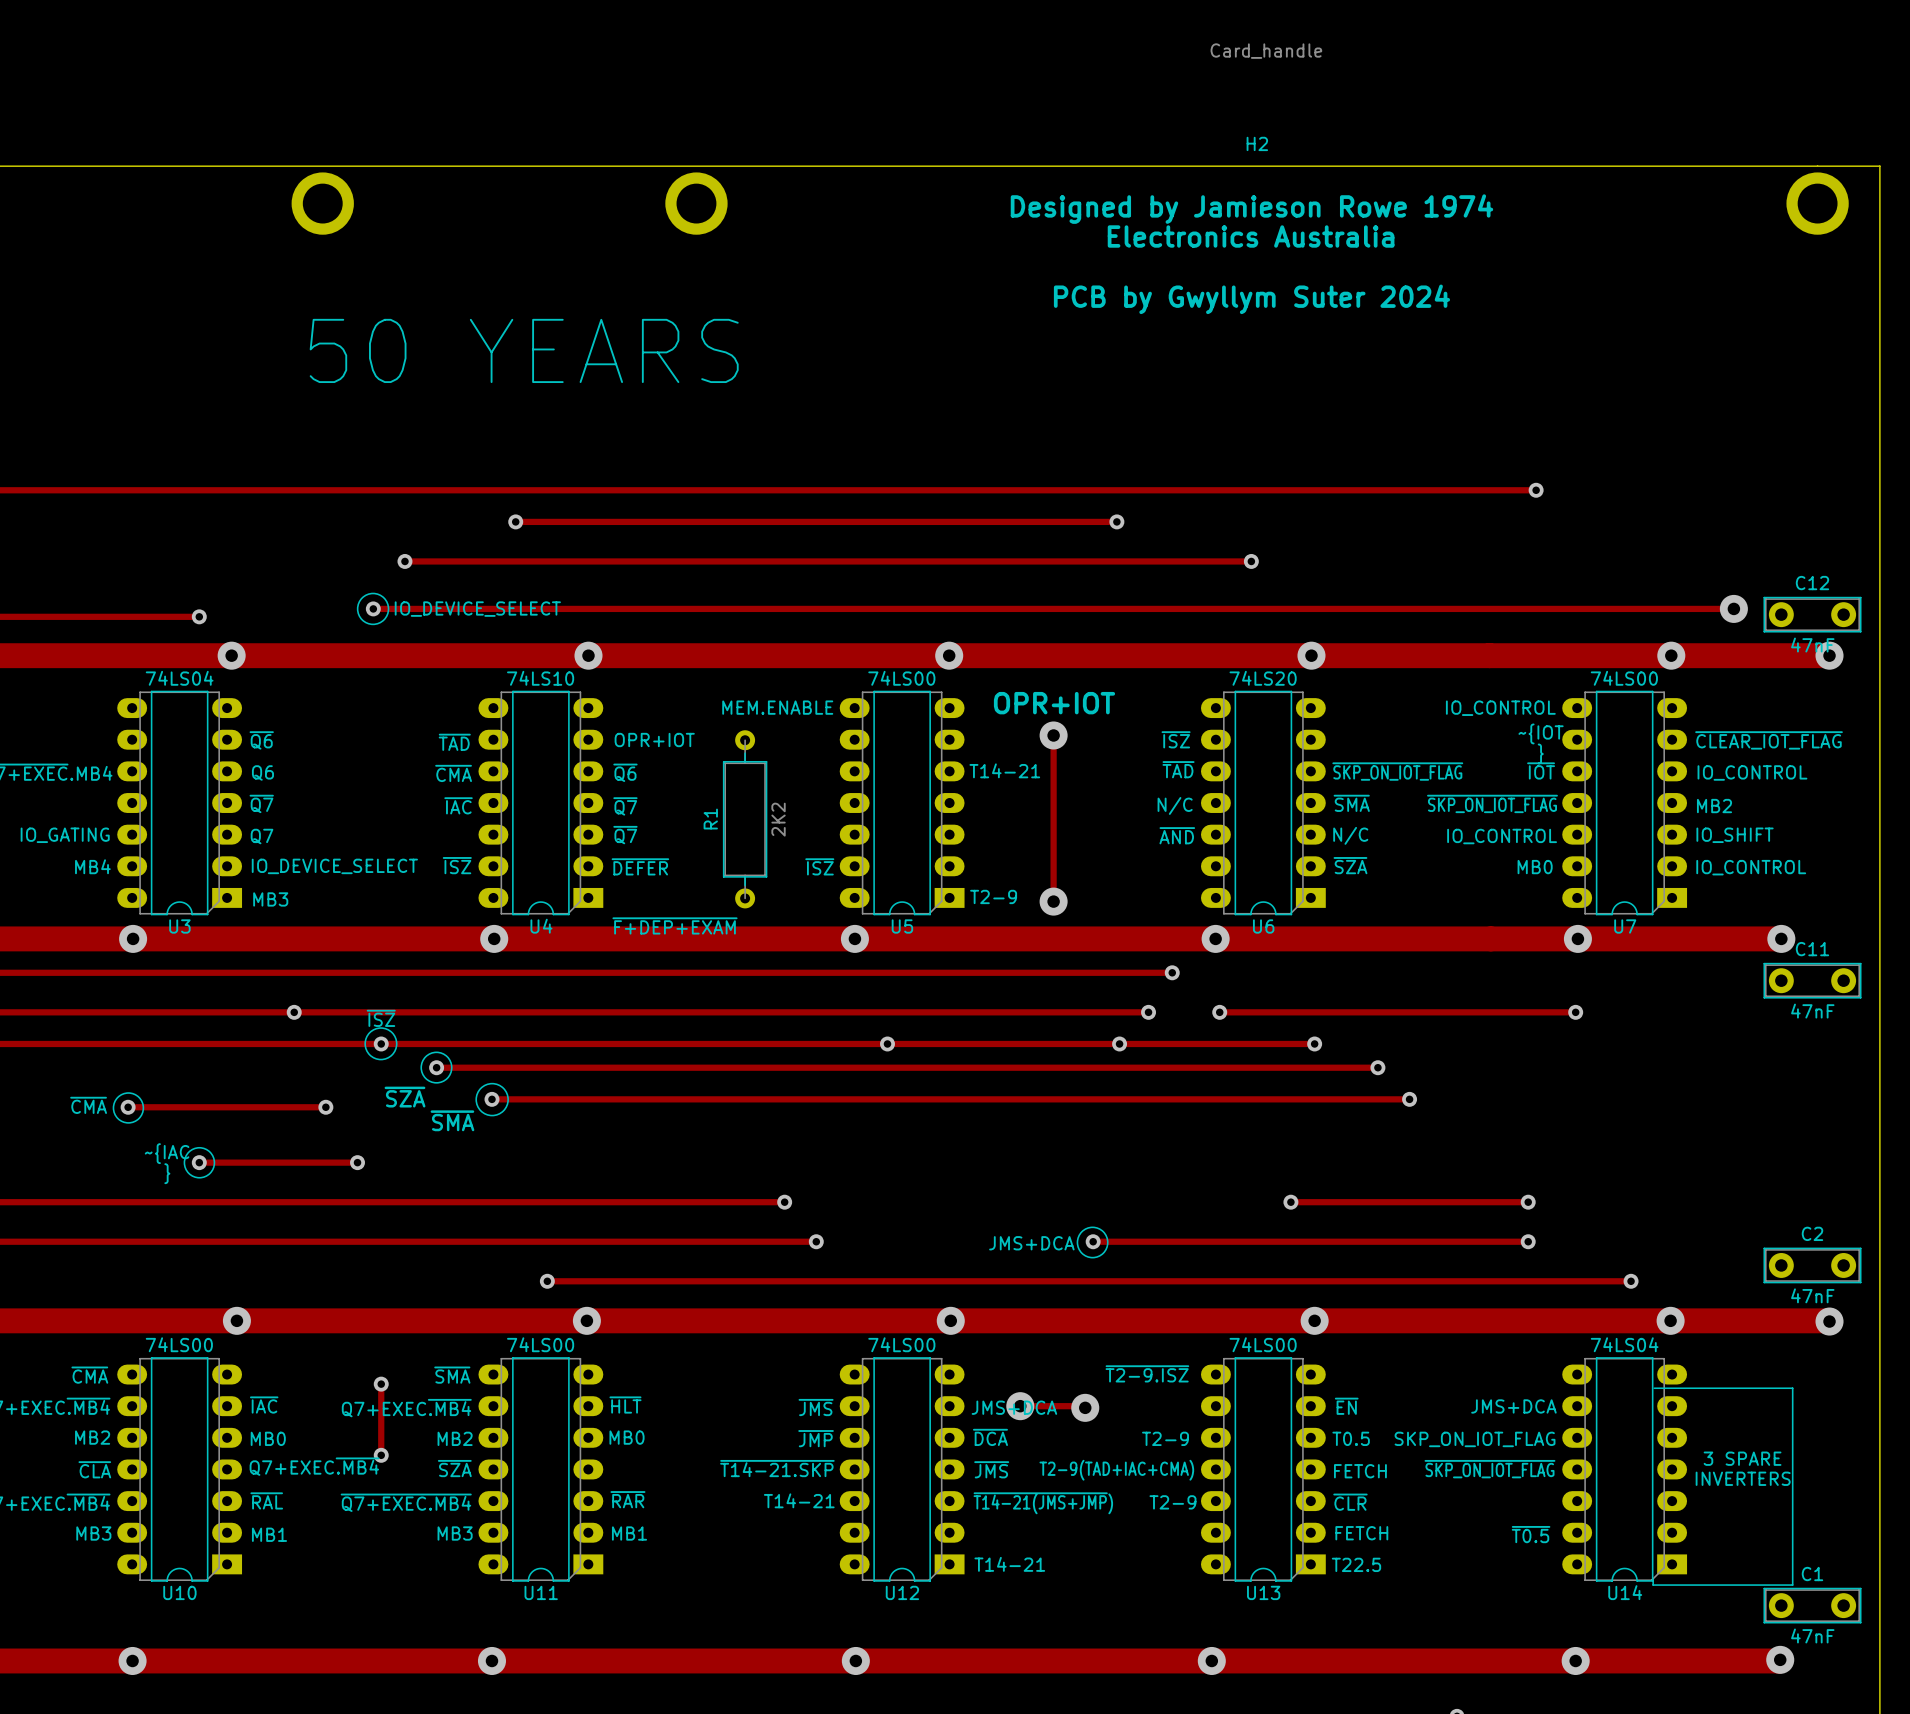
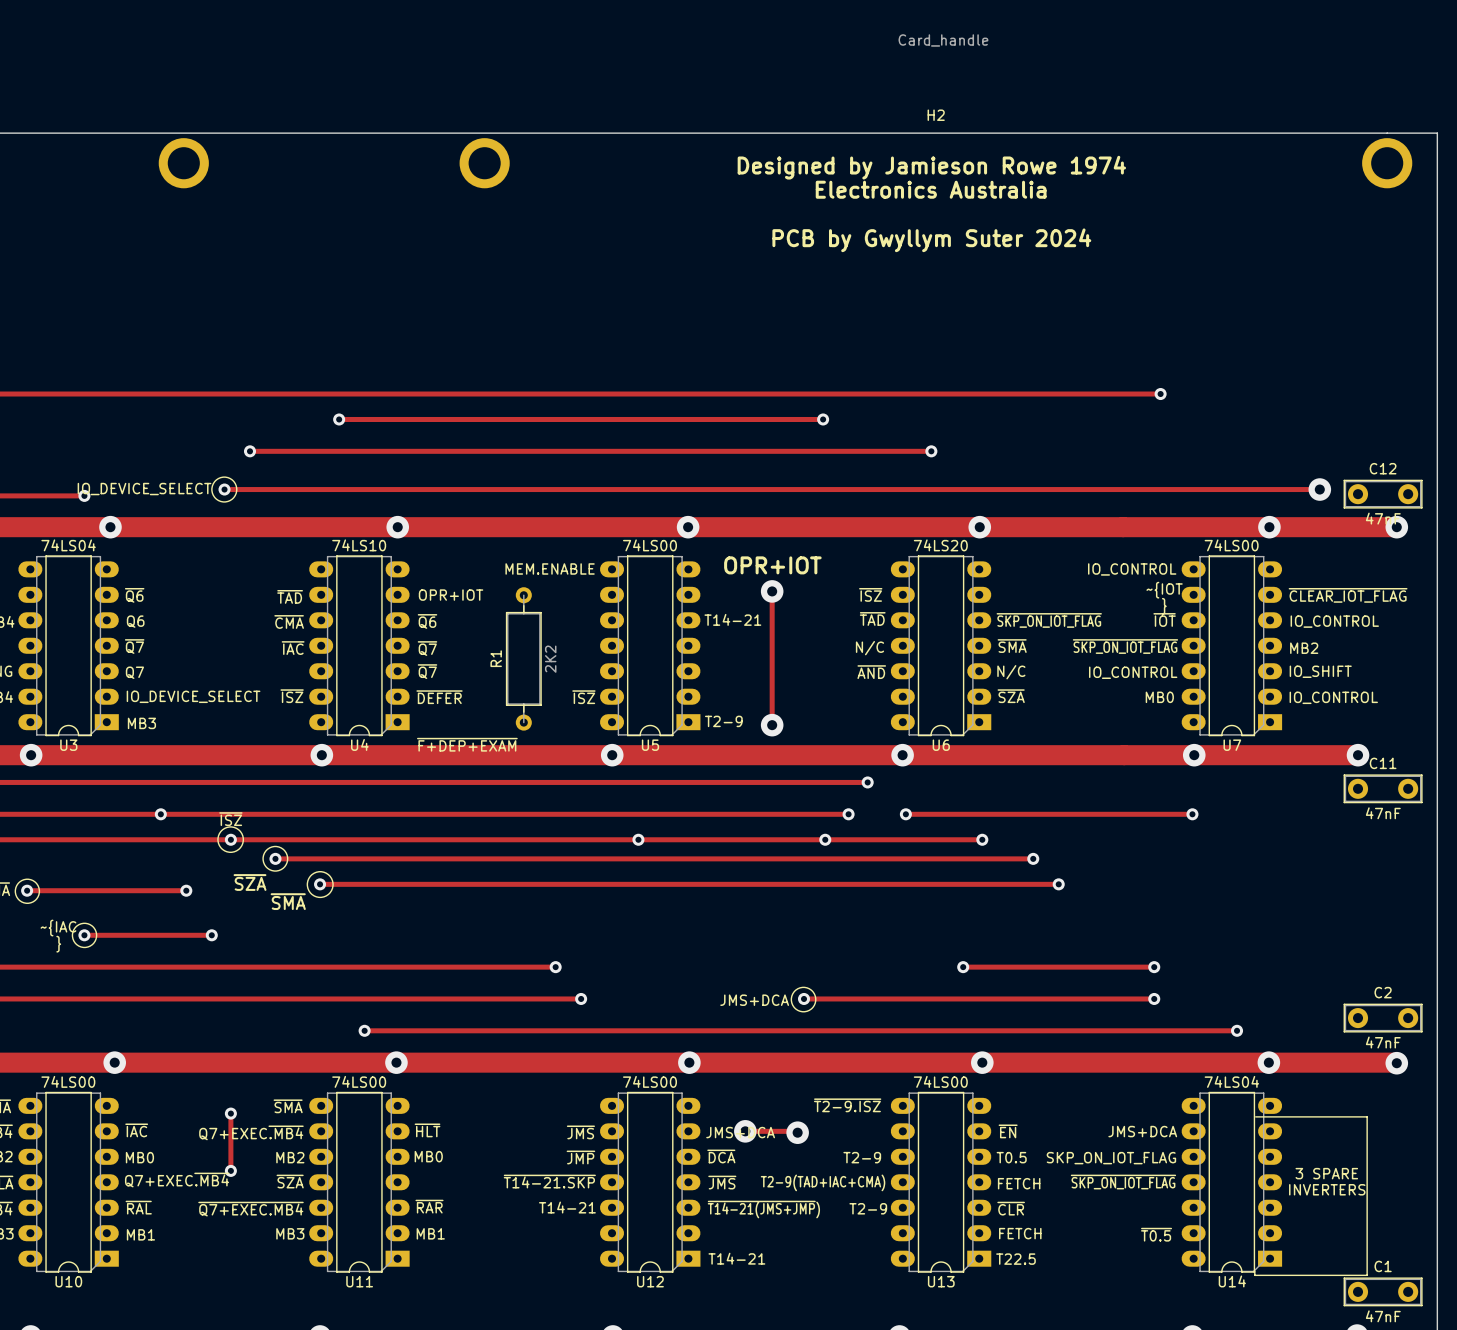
text: 50 YEARS (524, 350) -> none
text position: IO_DEVICE_SELECT (477, 609) -> IO_DEVICE_SELECT (144, 489)

